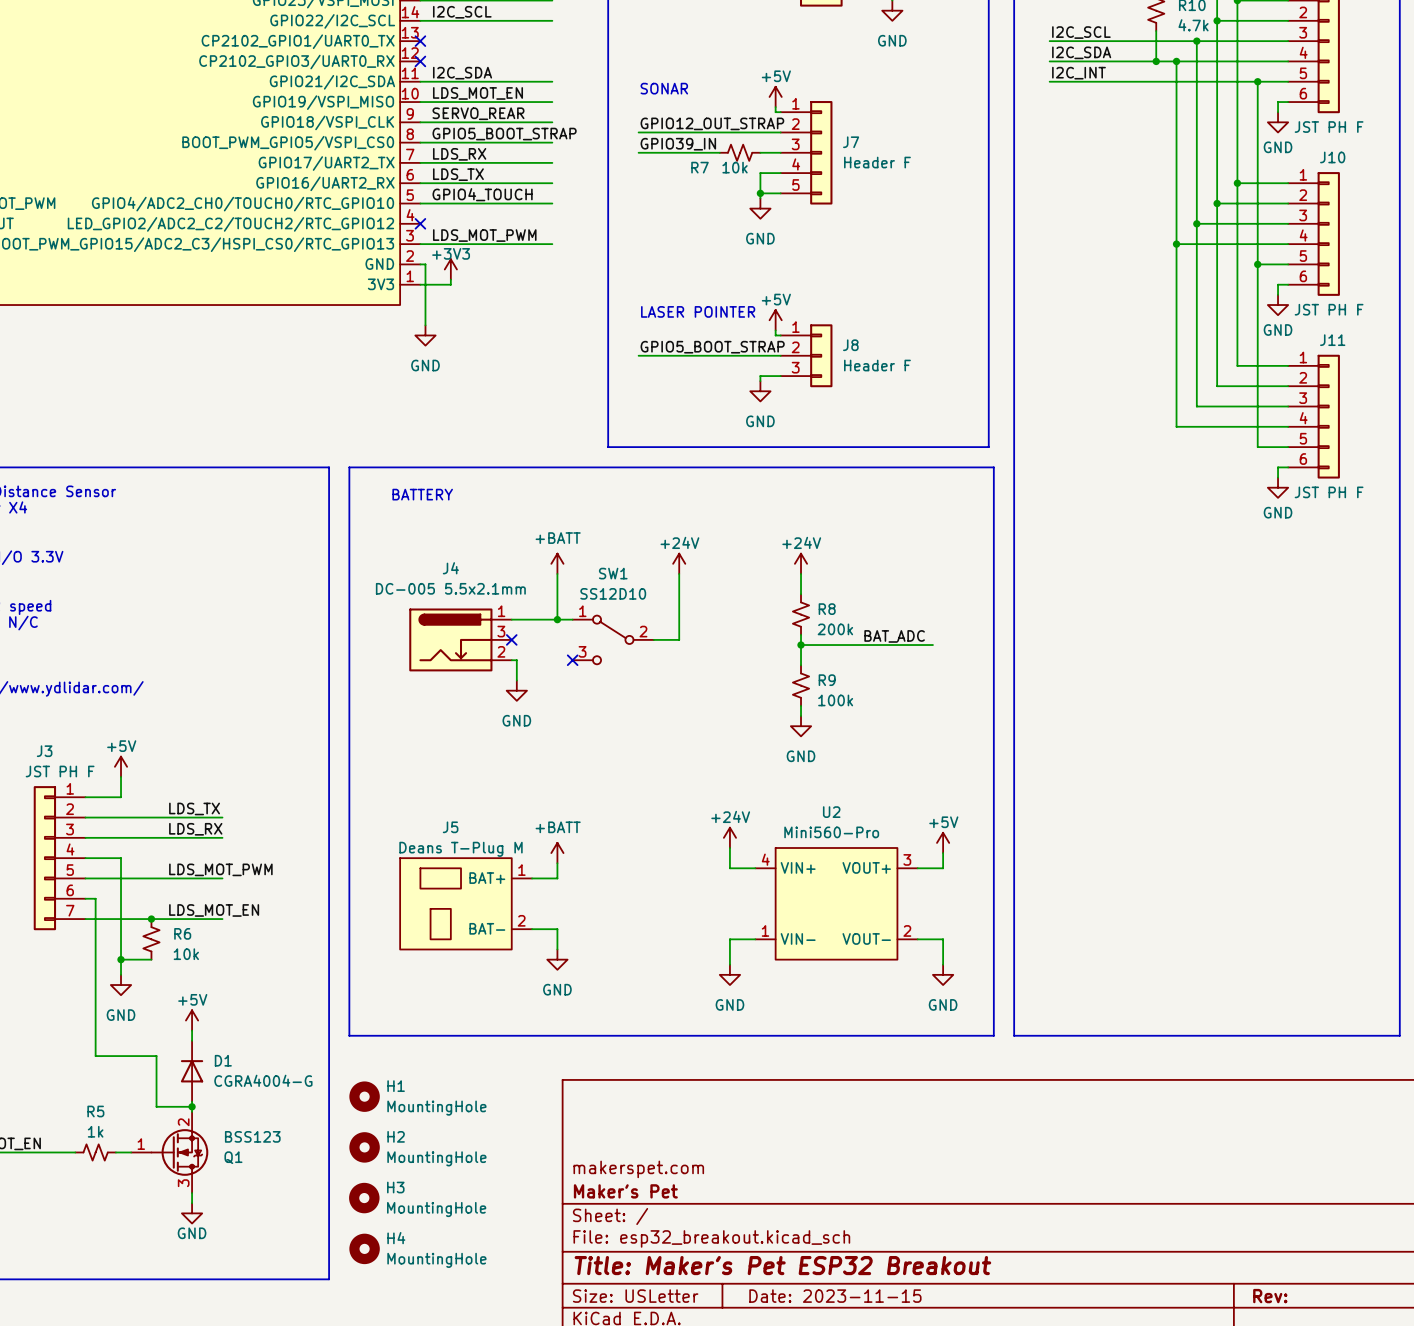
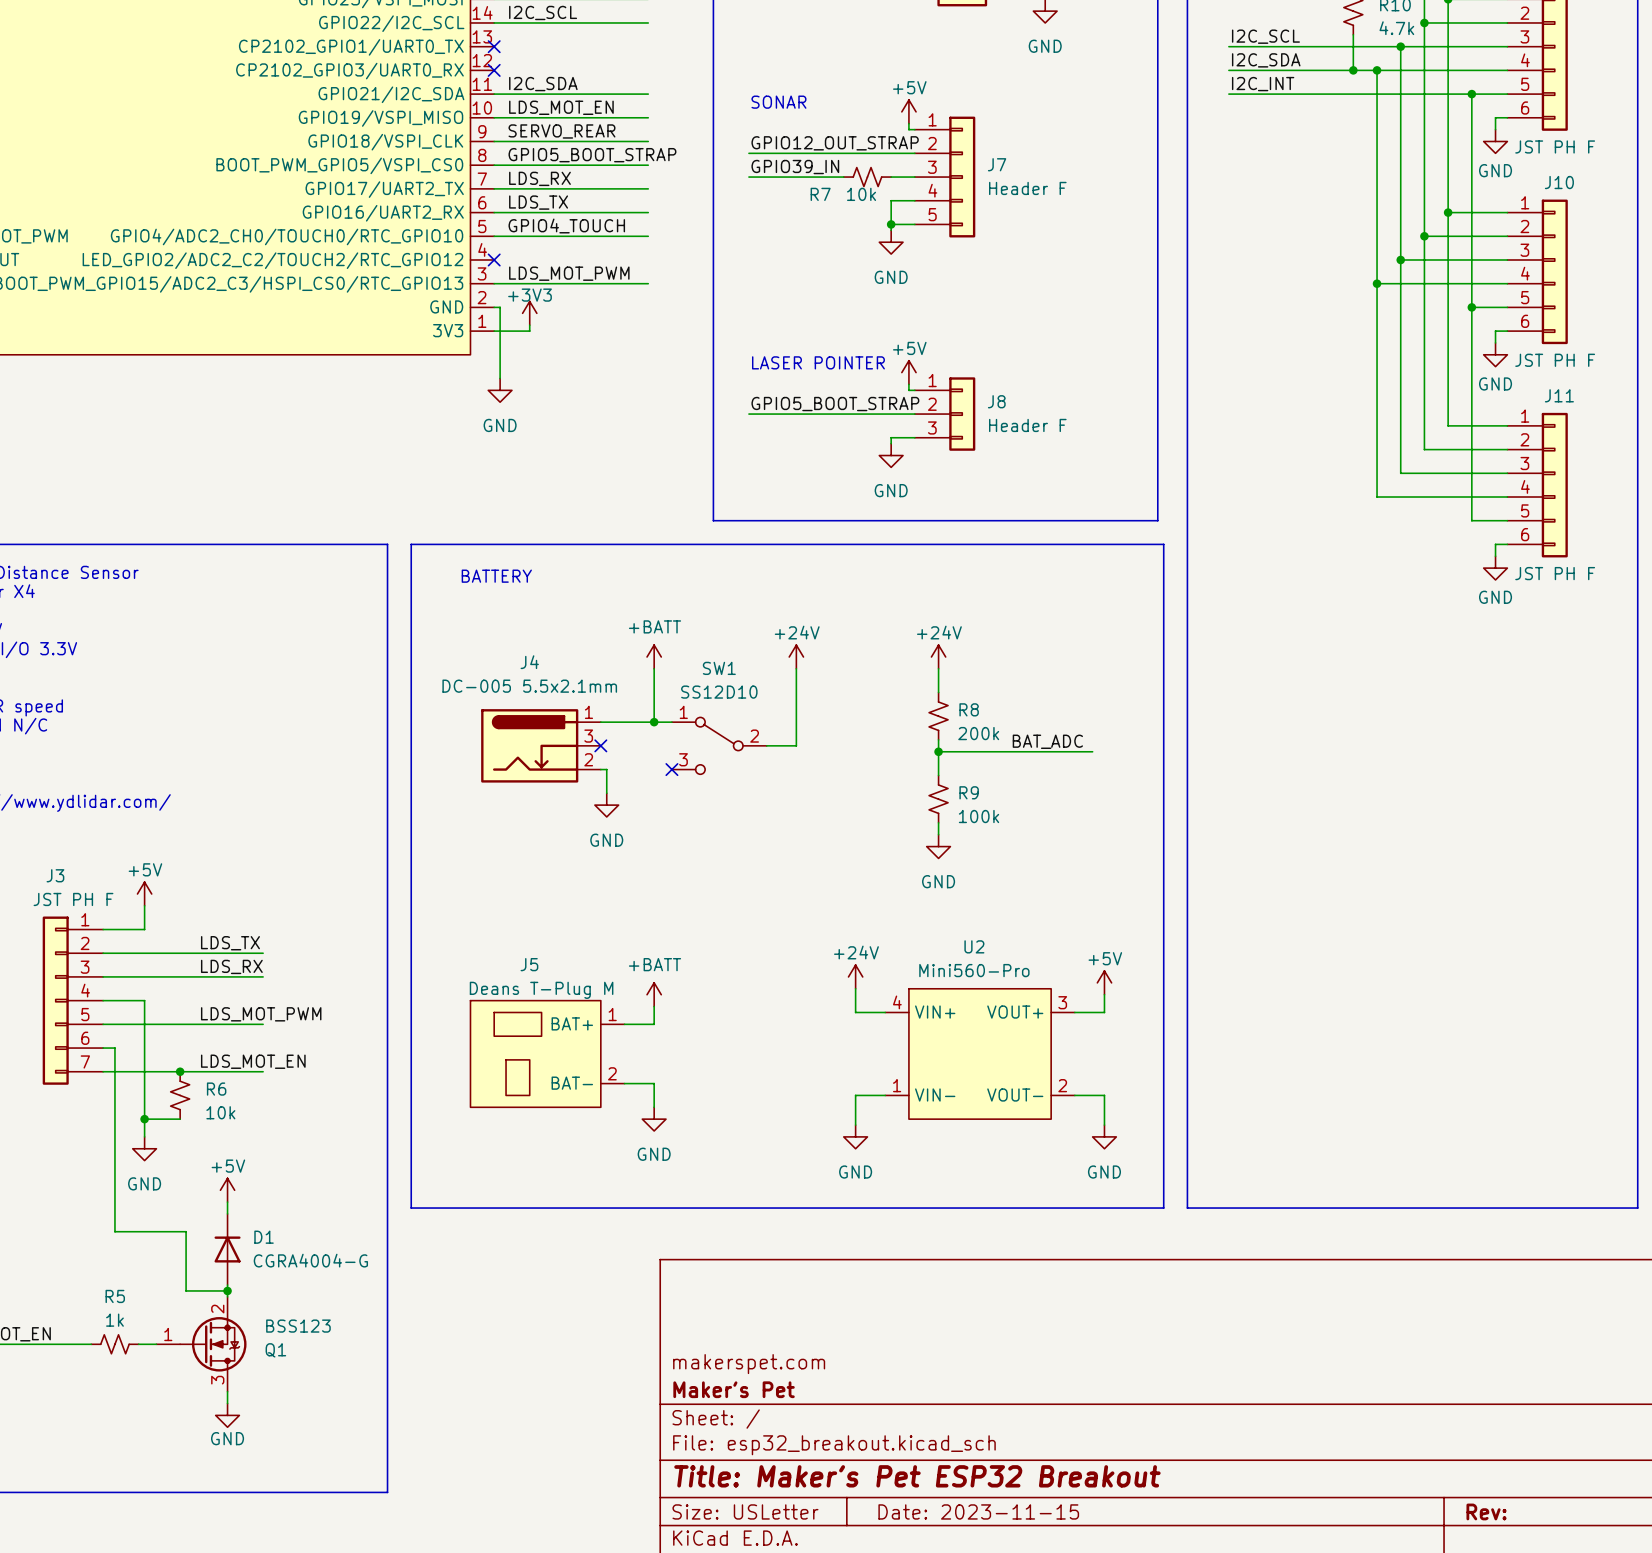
H1: MountingHole (364, 1096) -> none
H2: MountingHole (364, 1147) -> none
H3: MountingHole (364, 1198) -> none
H4: MountingHole (364, 1248) -> none

